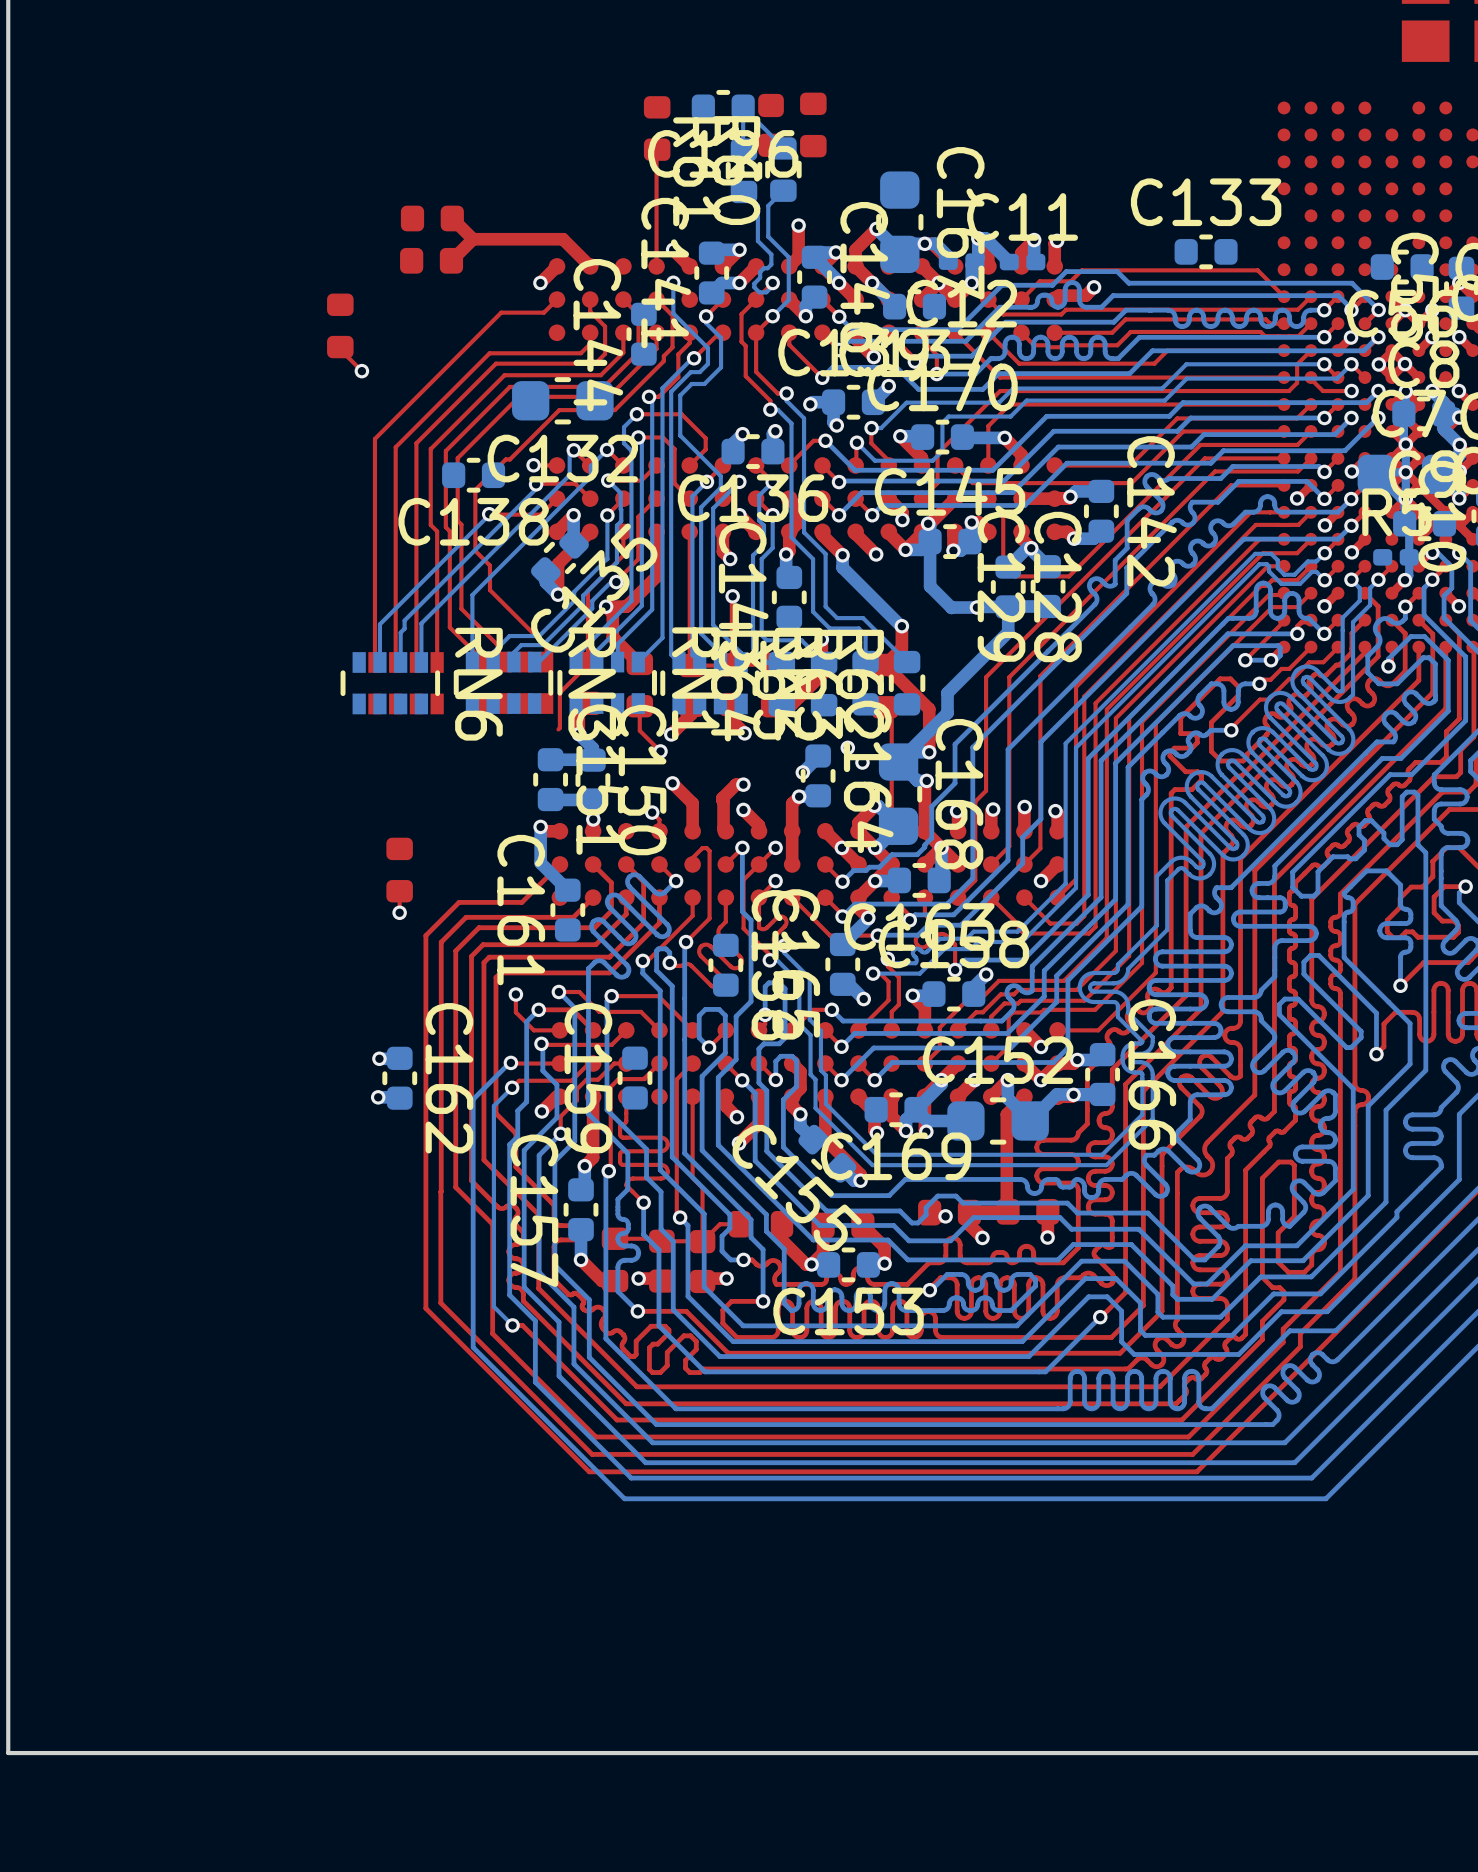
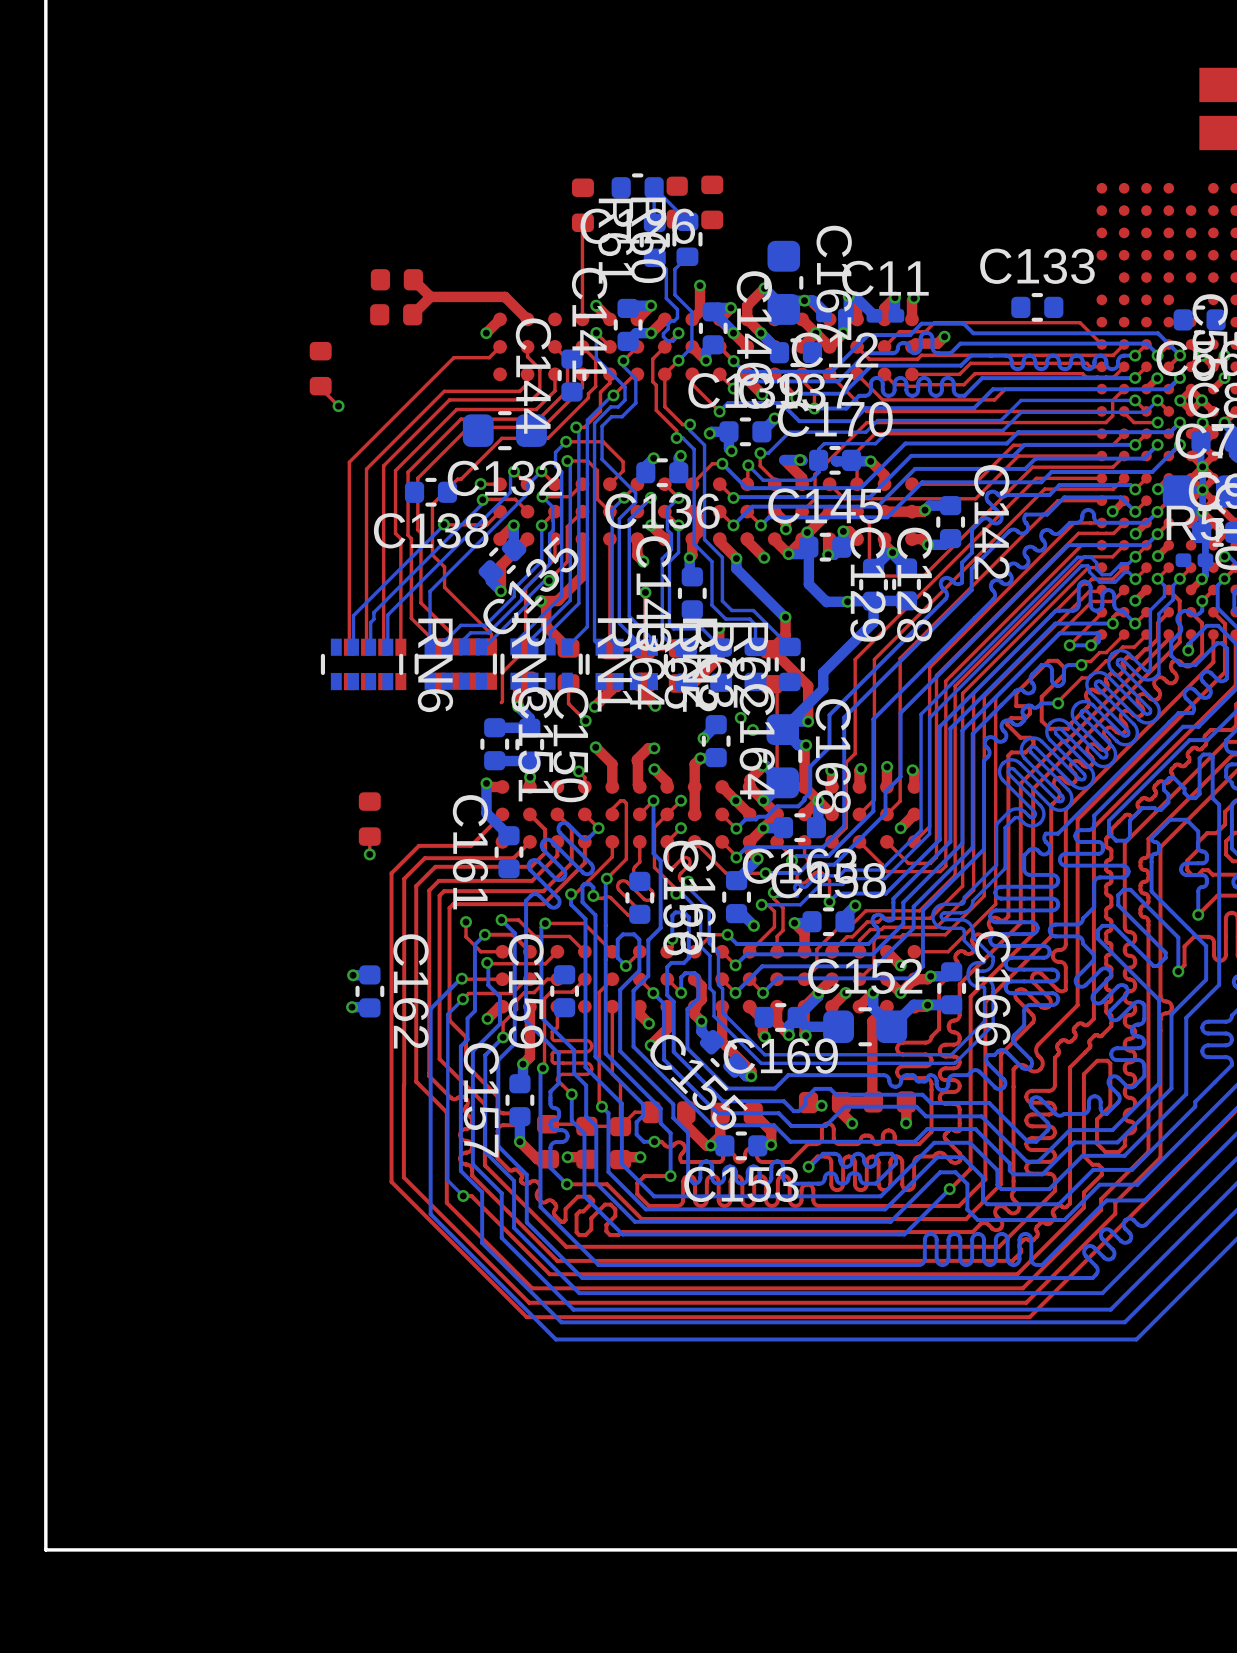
via position: (900, 436) -> (800, 459)
C170 position: (942, 437) -> (835, 460)

